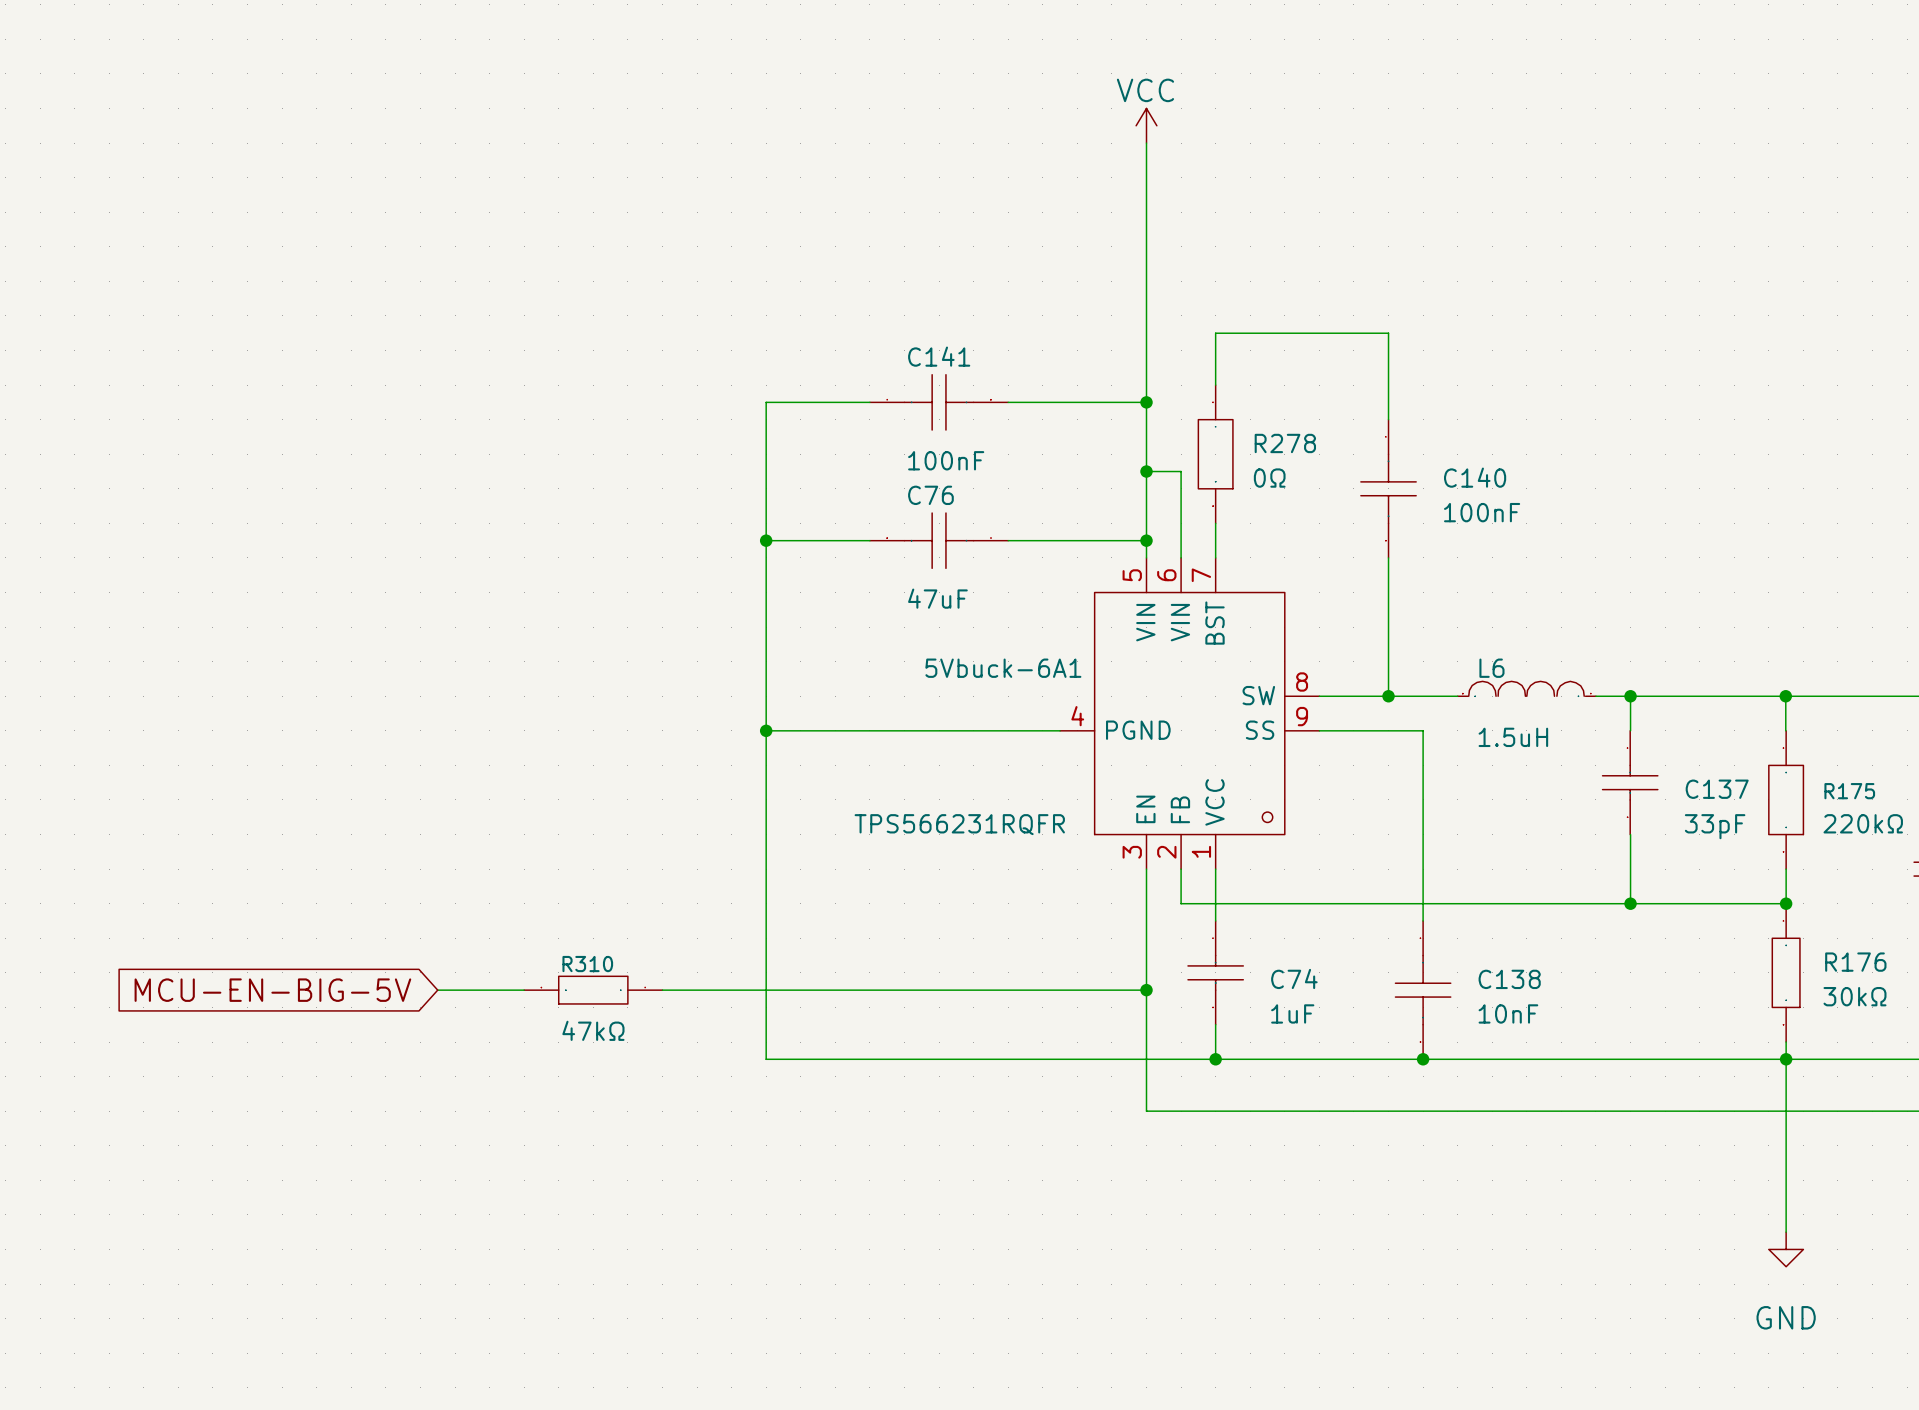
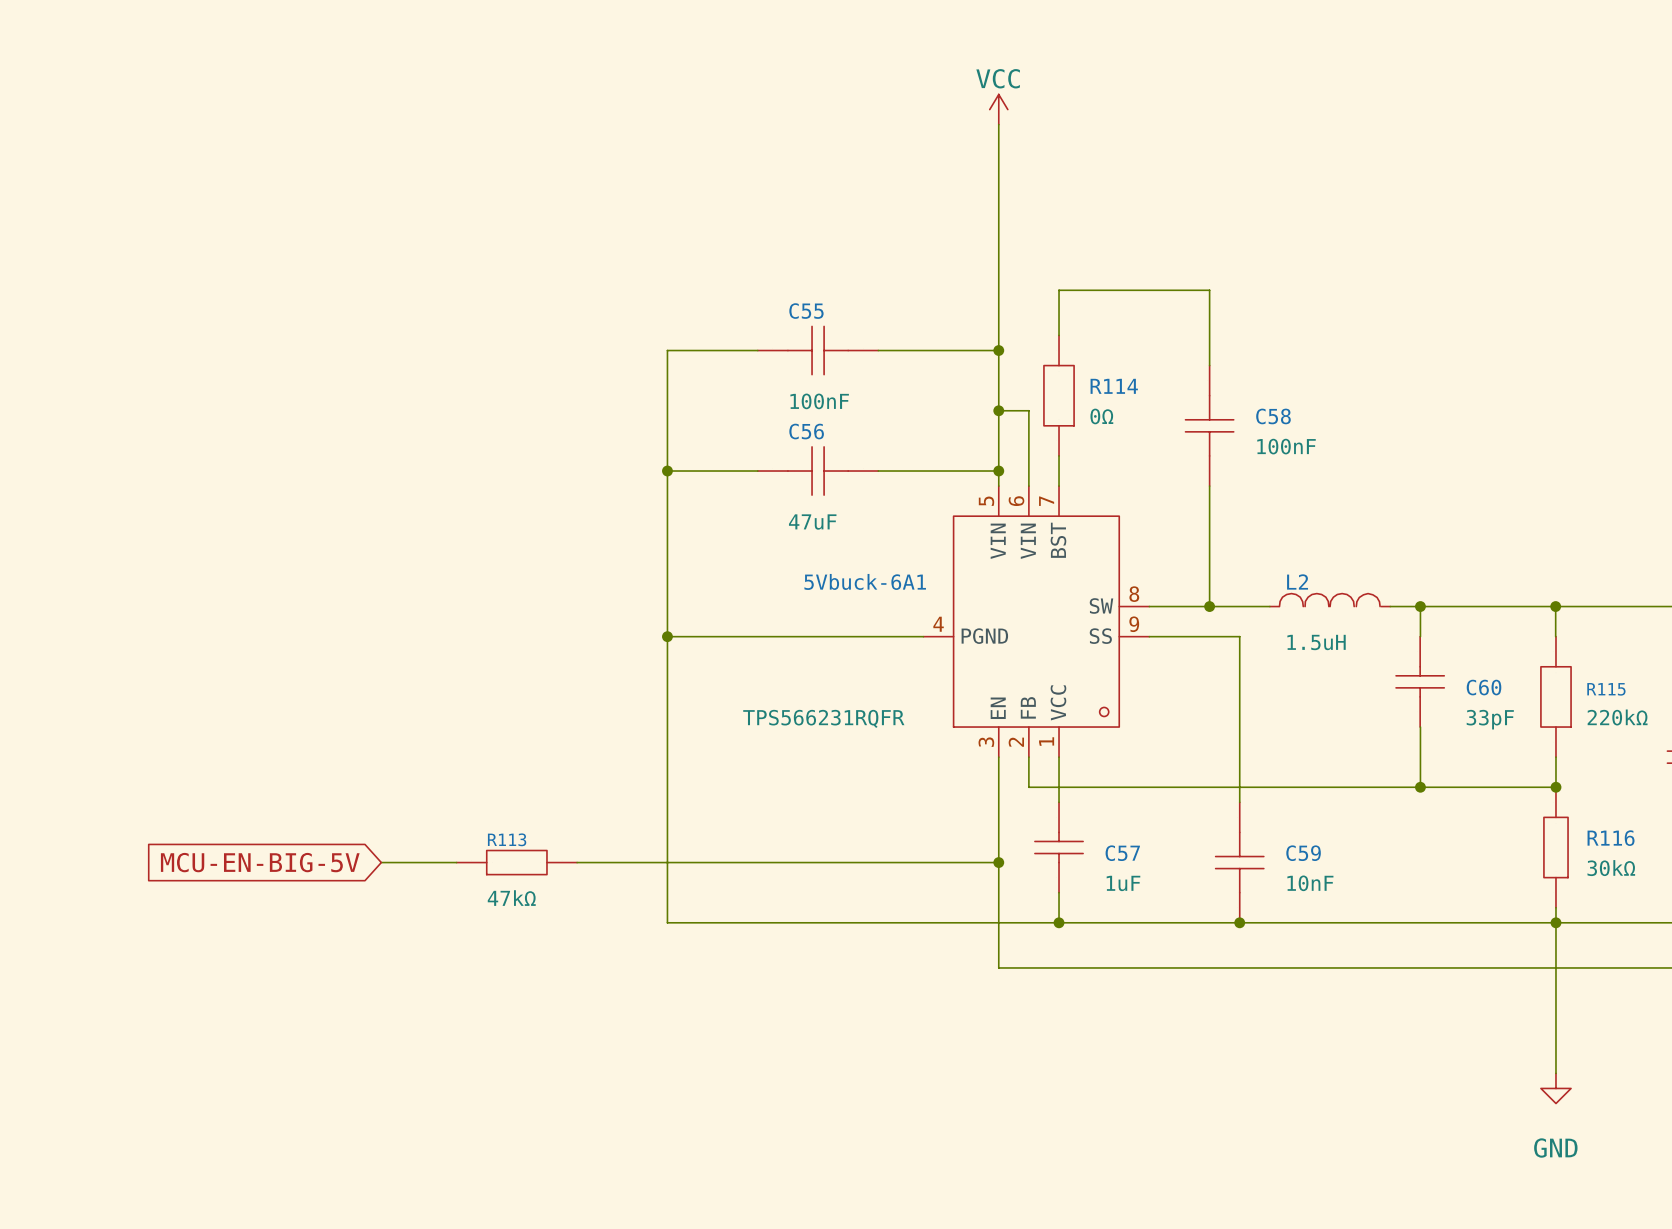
C141 name: C141 (939, 356) -> C55 (806, 311)
R278 name: R278 (1285, 443) -> R114 (1114, 386)
C140 name: C140 (1475, 477) -> C58 (1273, 416)
C76 name: C76 (930, 495) -> C56 (806, 431)
L6 name: L6 (1491, 668) -> L2 (1297, 581)
C137 name: C137 (1717, 789) -> C60 (1484, 687)
R175 name: R175 (1849, 791) -> R115 (1606, 689)
R176 name: R176 (1855, 962) -> R116 (1611, 838)
R310 name: R310 (587, 964) -> R113 (507, 839)
C74 name: C74 (1294, 978) -> C57 (1122, 853)
C138 name: C138 (1509, 979) -> C59 (1303, 853)

